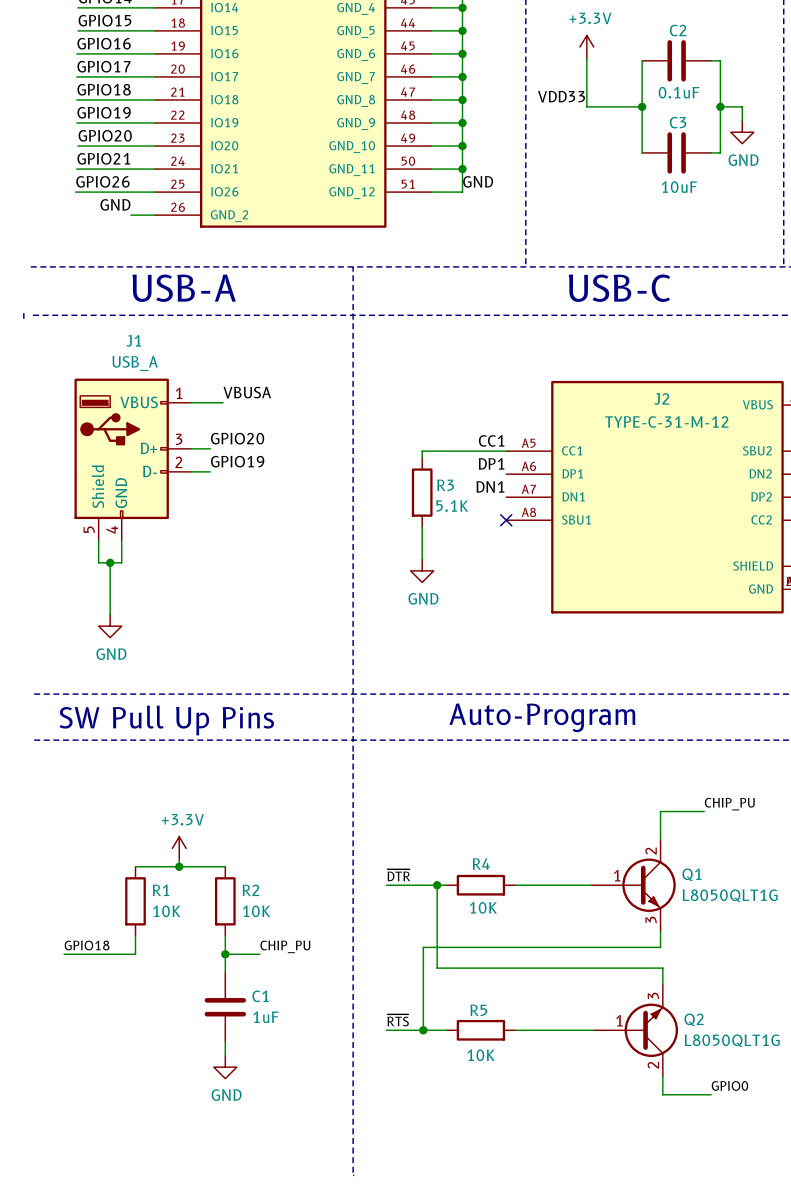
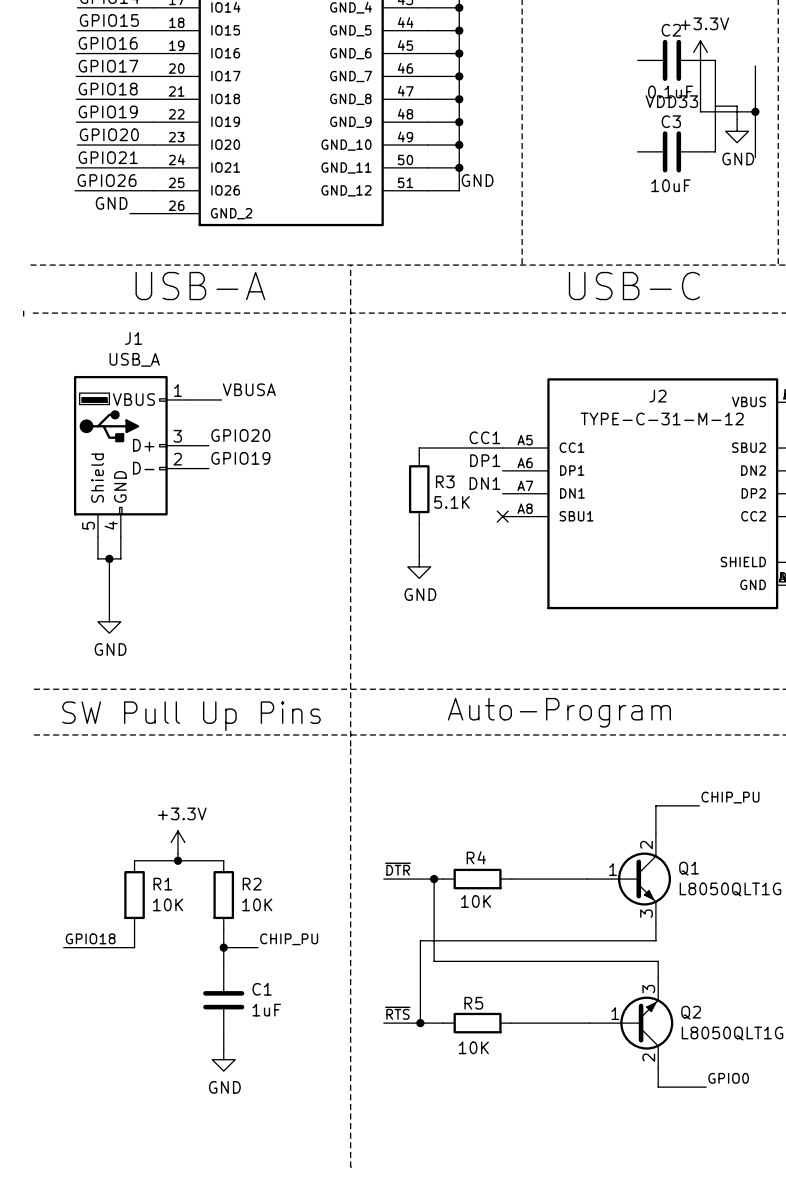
power symbol position: +3.3V (586, 47) -> +3.3V (700, 52)
wire: (586, 58) (586, 106) (642, 106) -> (700, 63) (700, 111) (755, 111)
wire: (642, 60) (642, 152) -> (755, 66) (755, 157)
label position: VDD33 (561, 96) -> VDD33 (671, 101)
junction: (642, 106) -> none
junction position: (720, 106) -> (755, 111)

